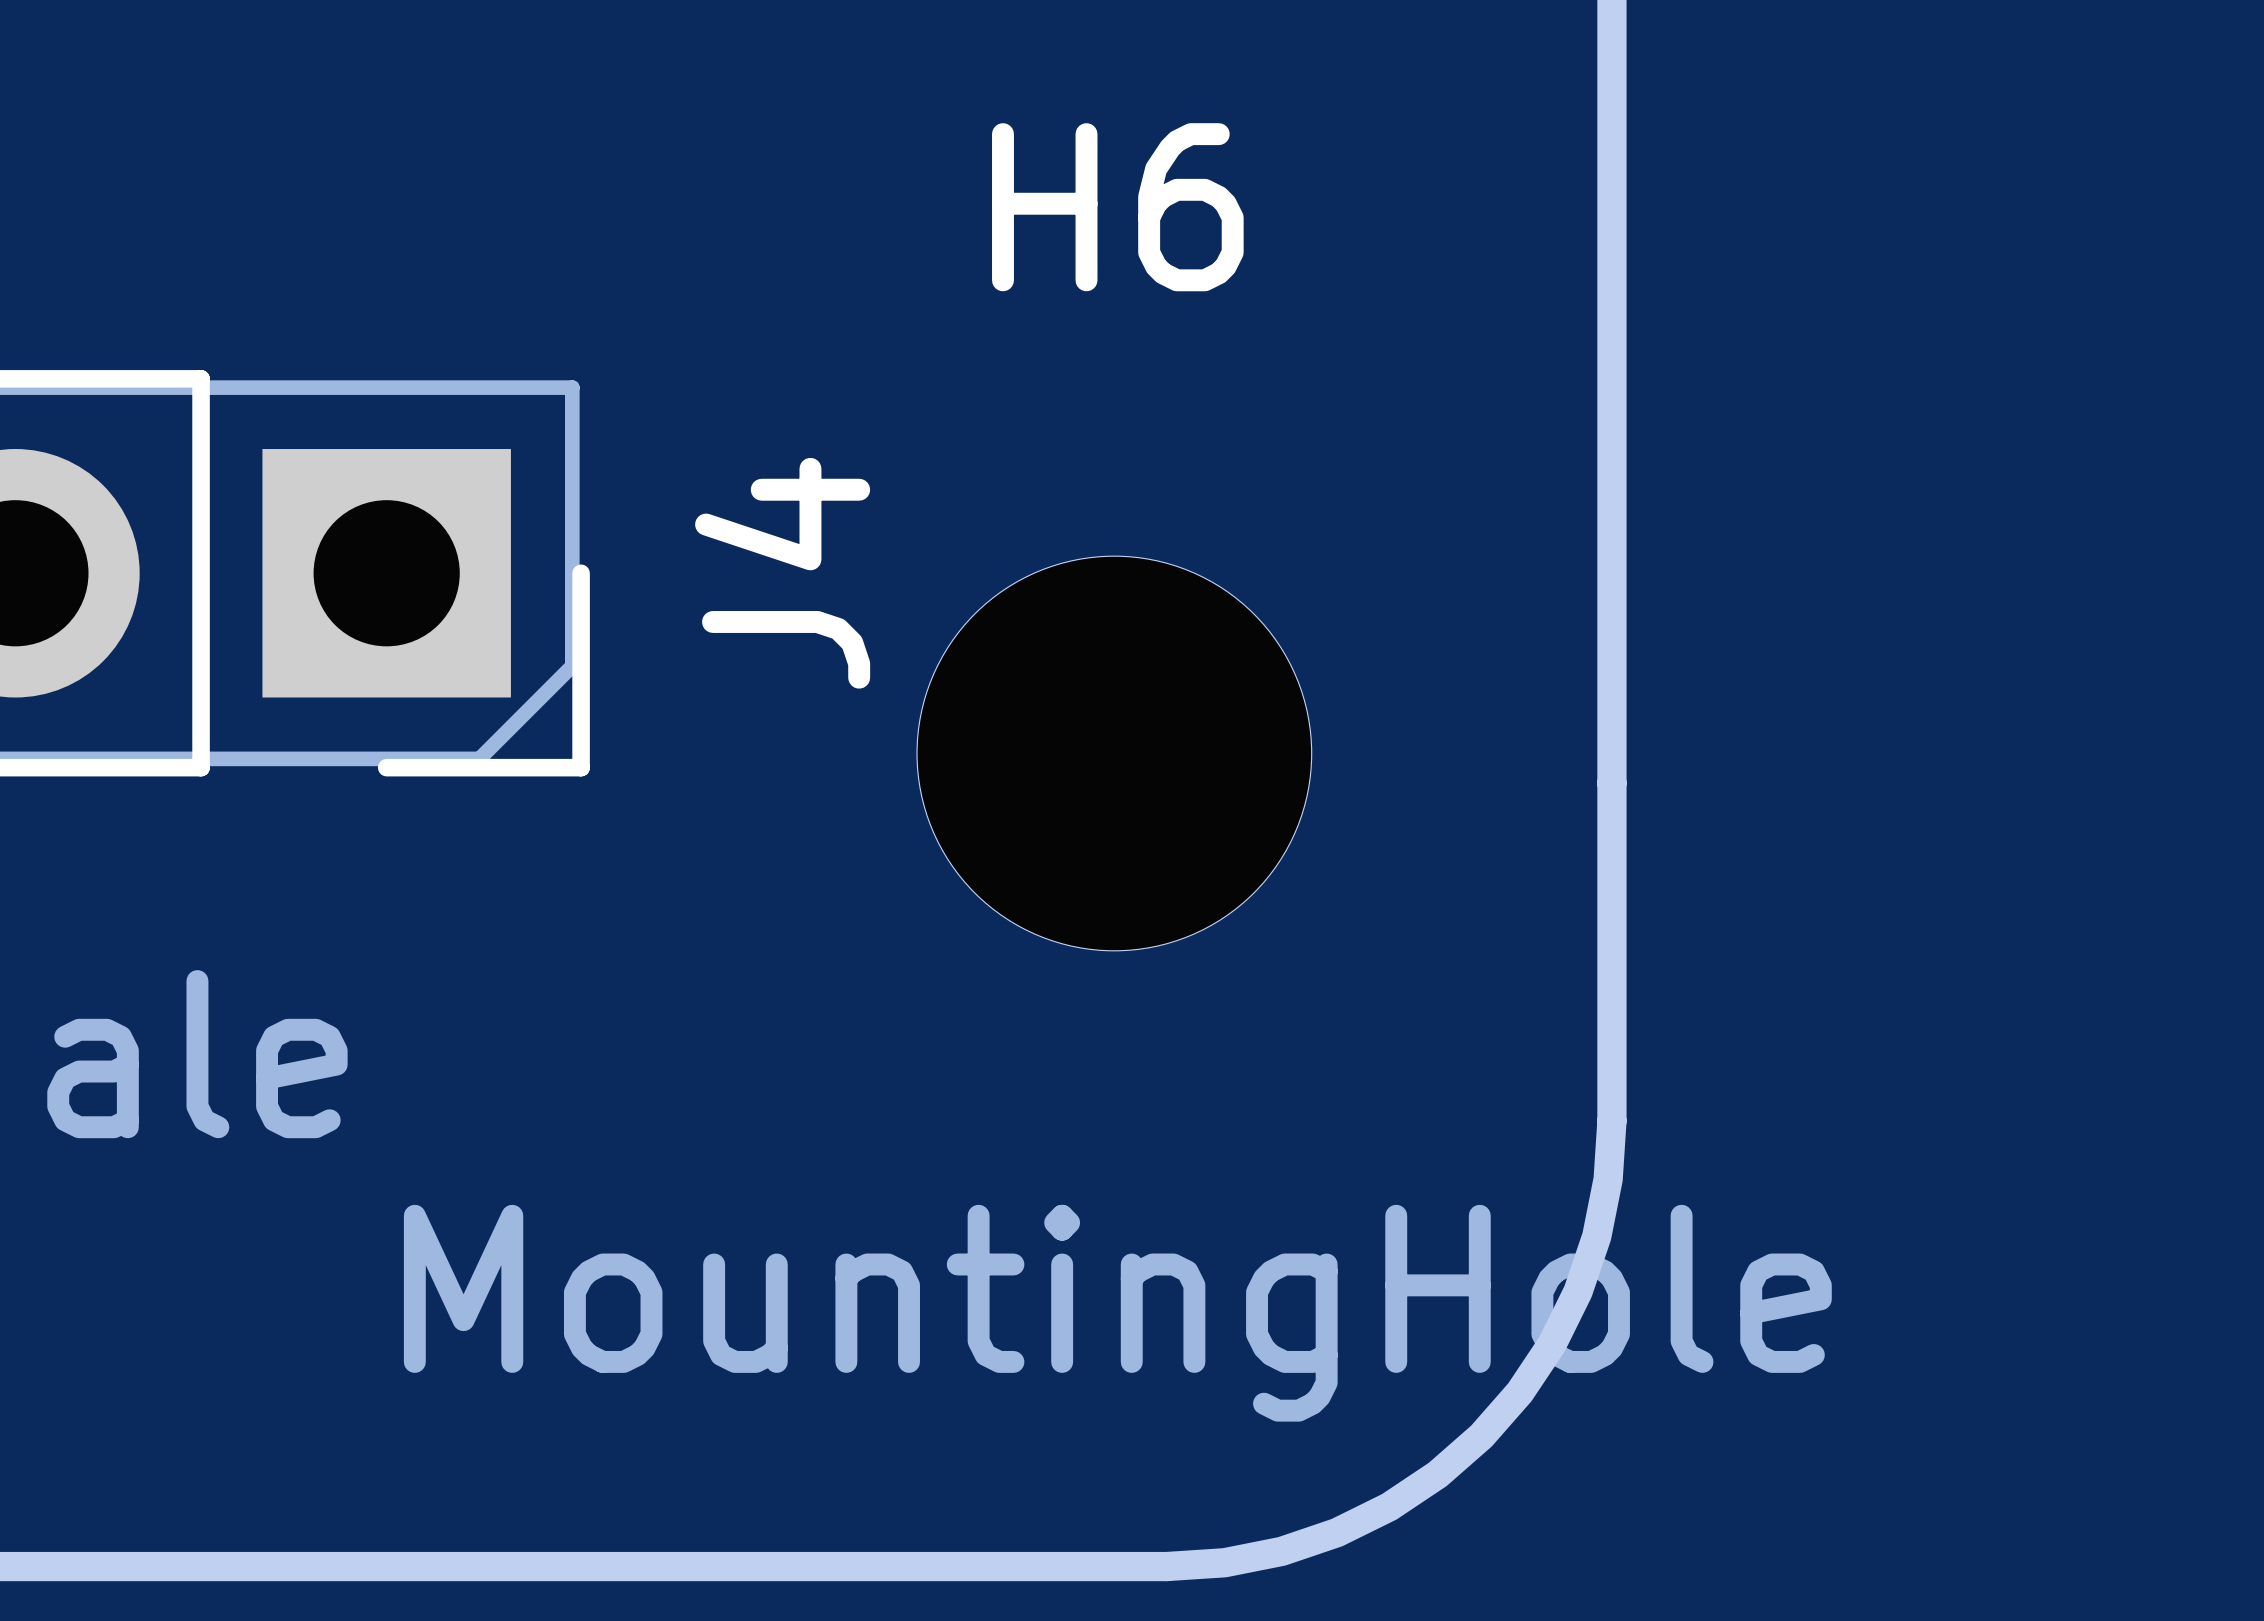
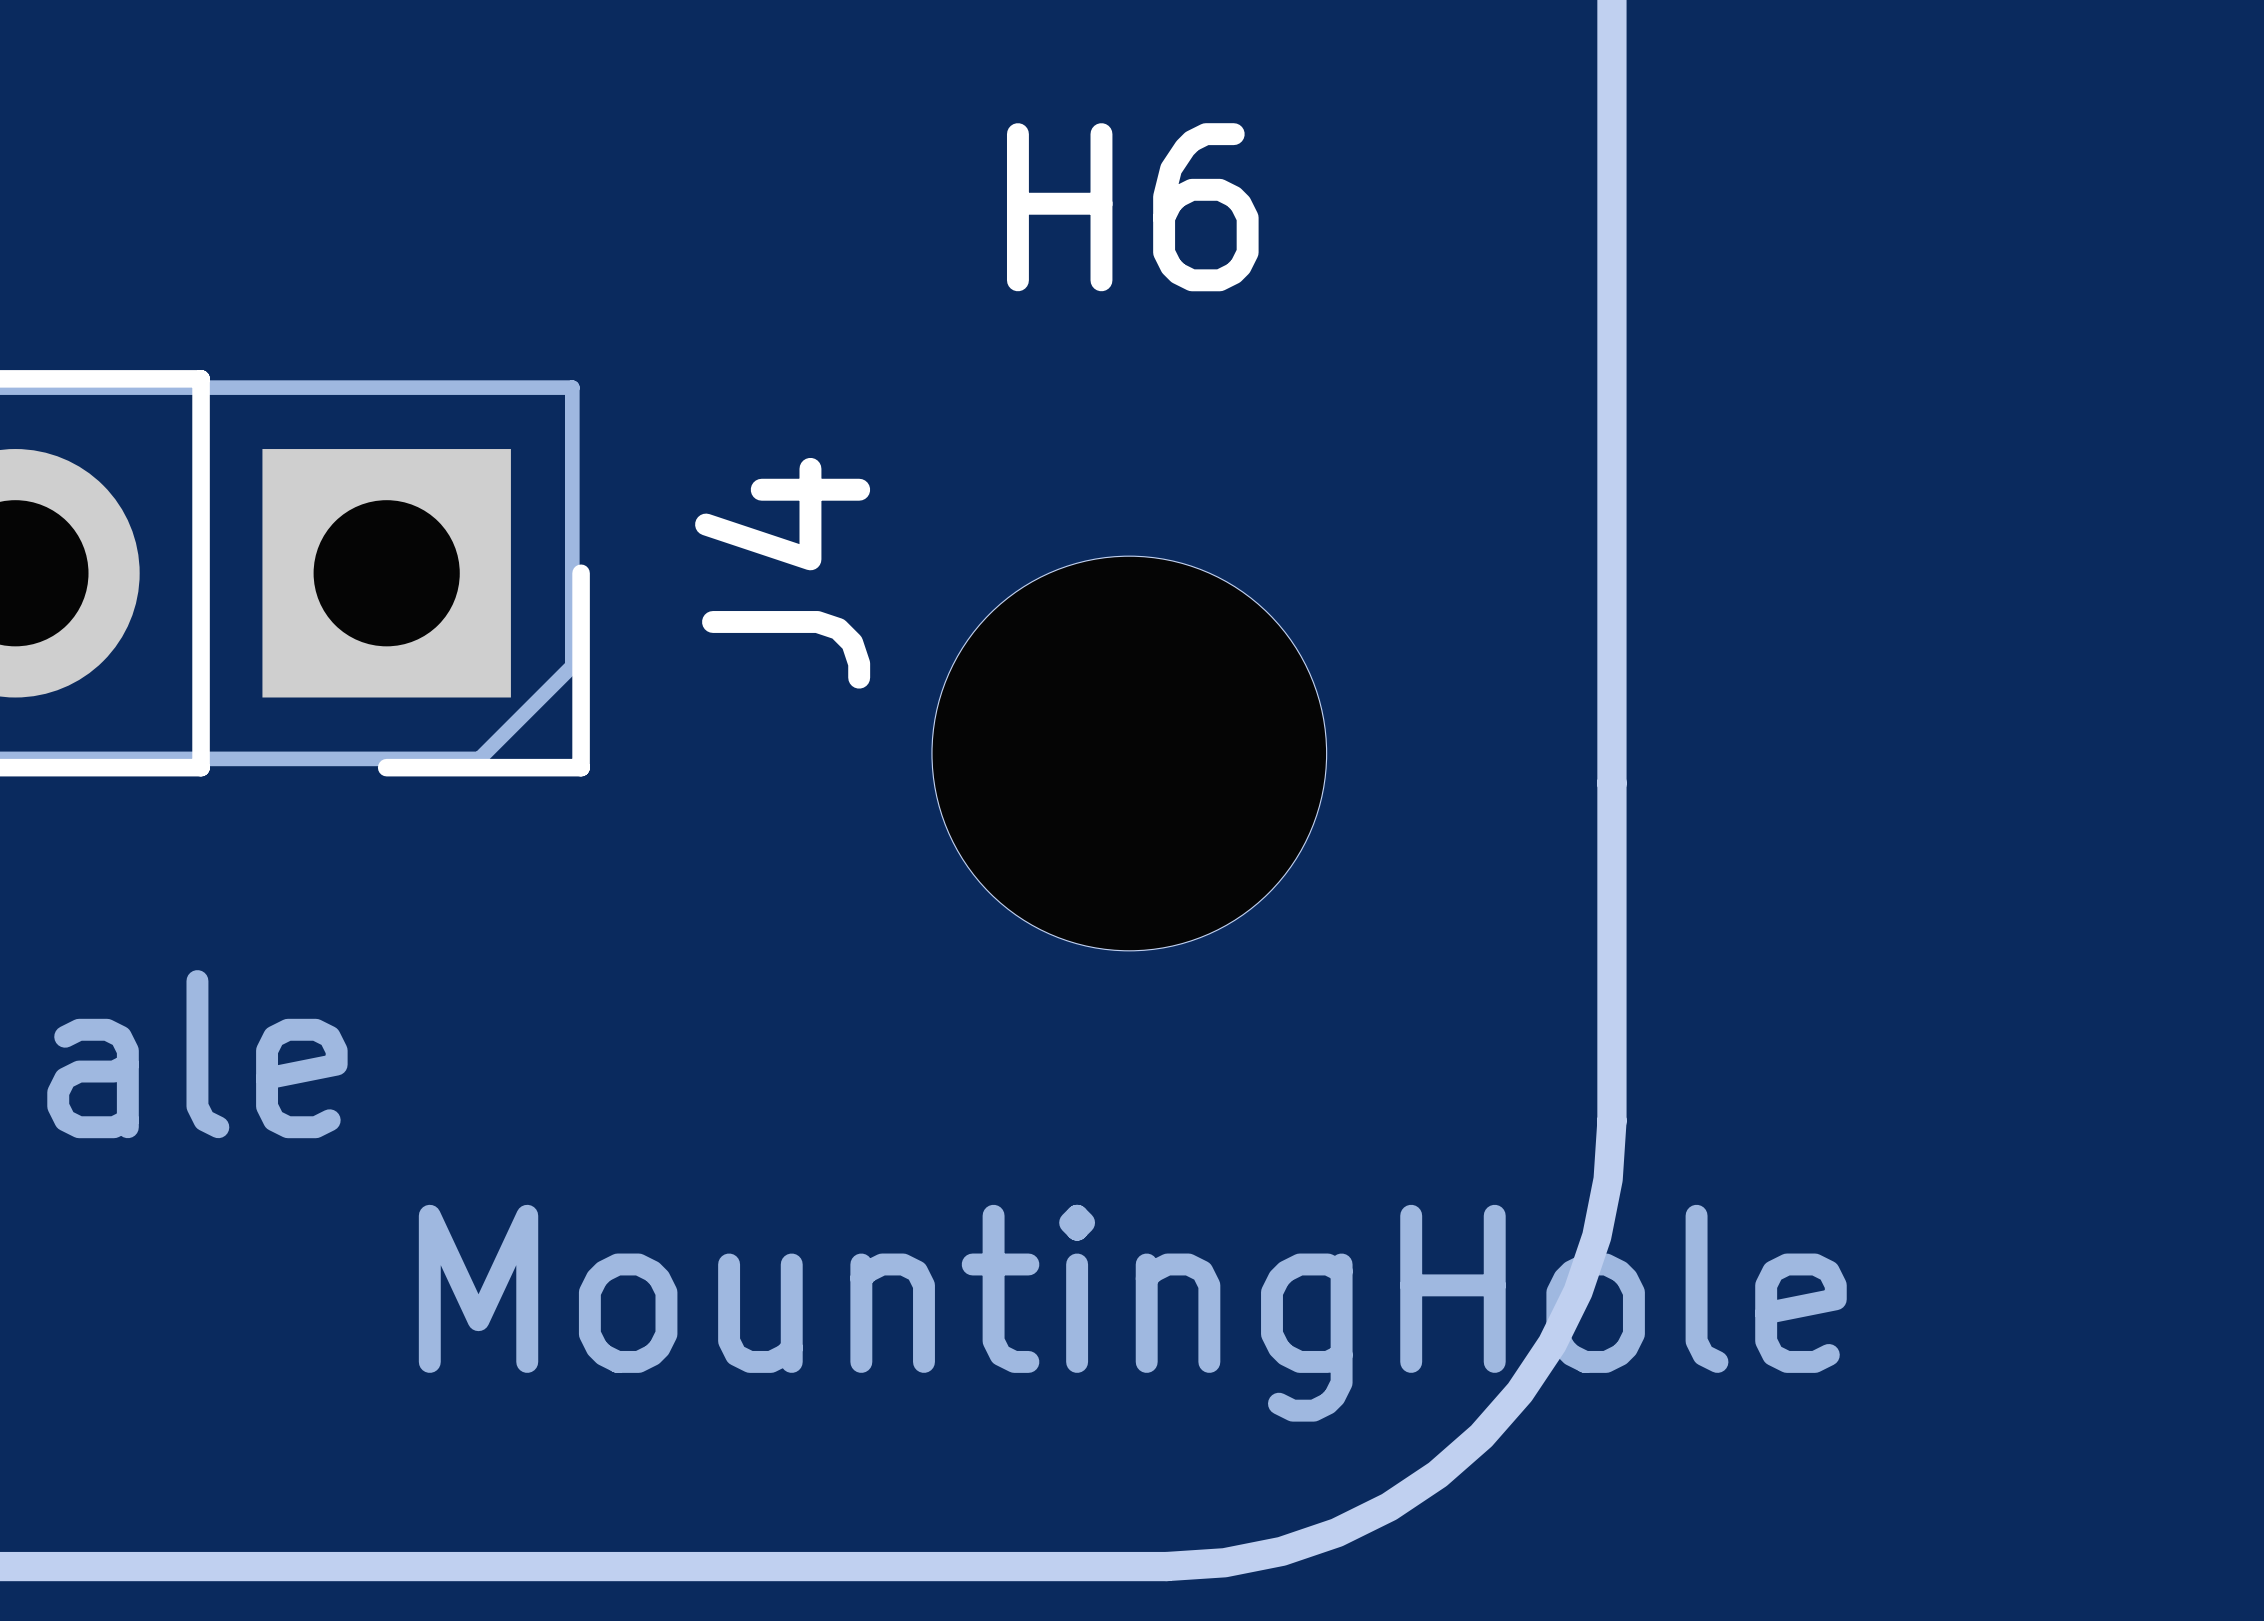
H6 position: (1114, 753) -> (1129, 753)

